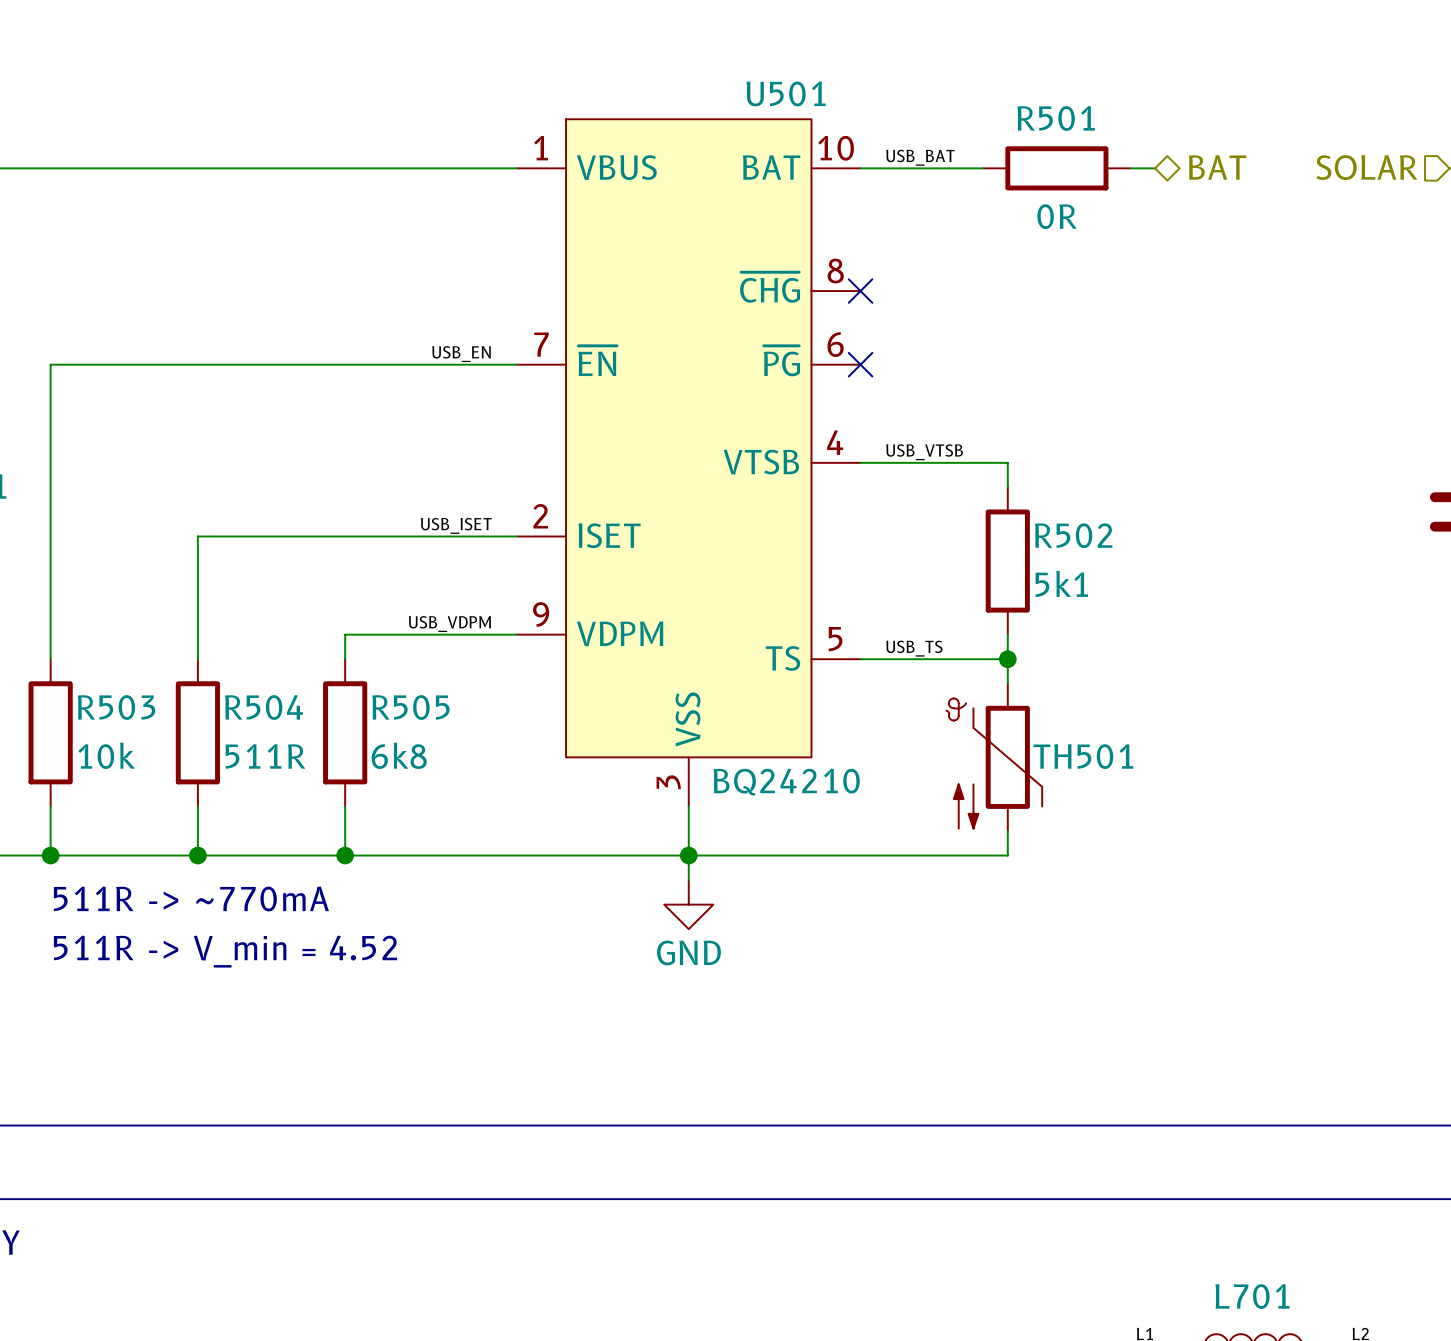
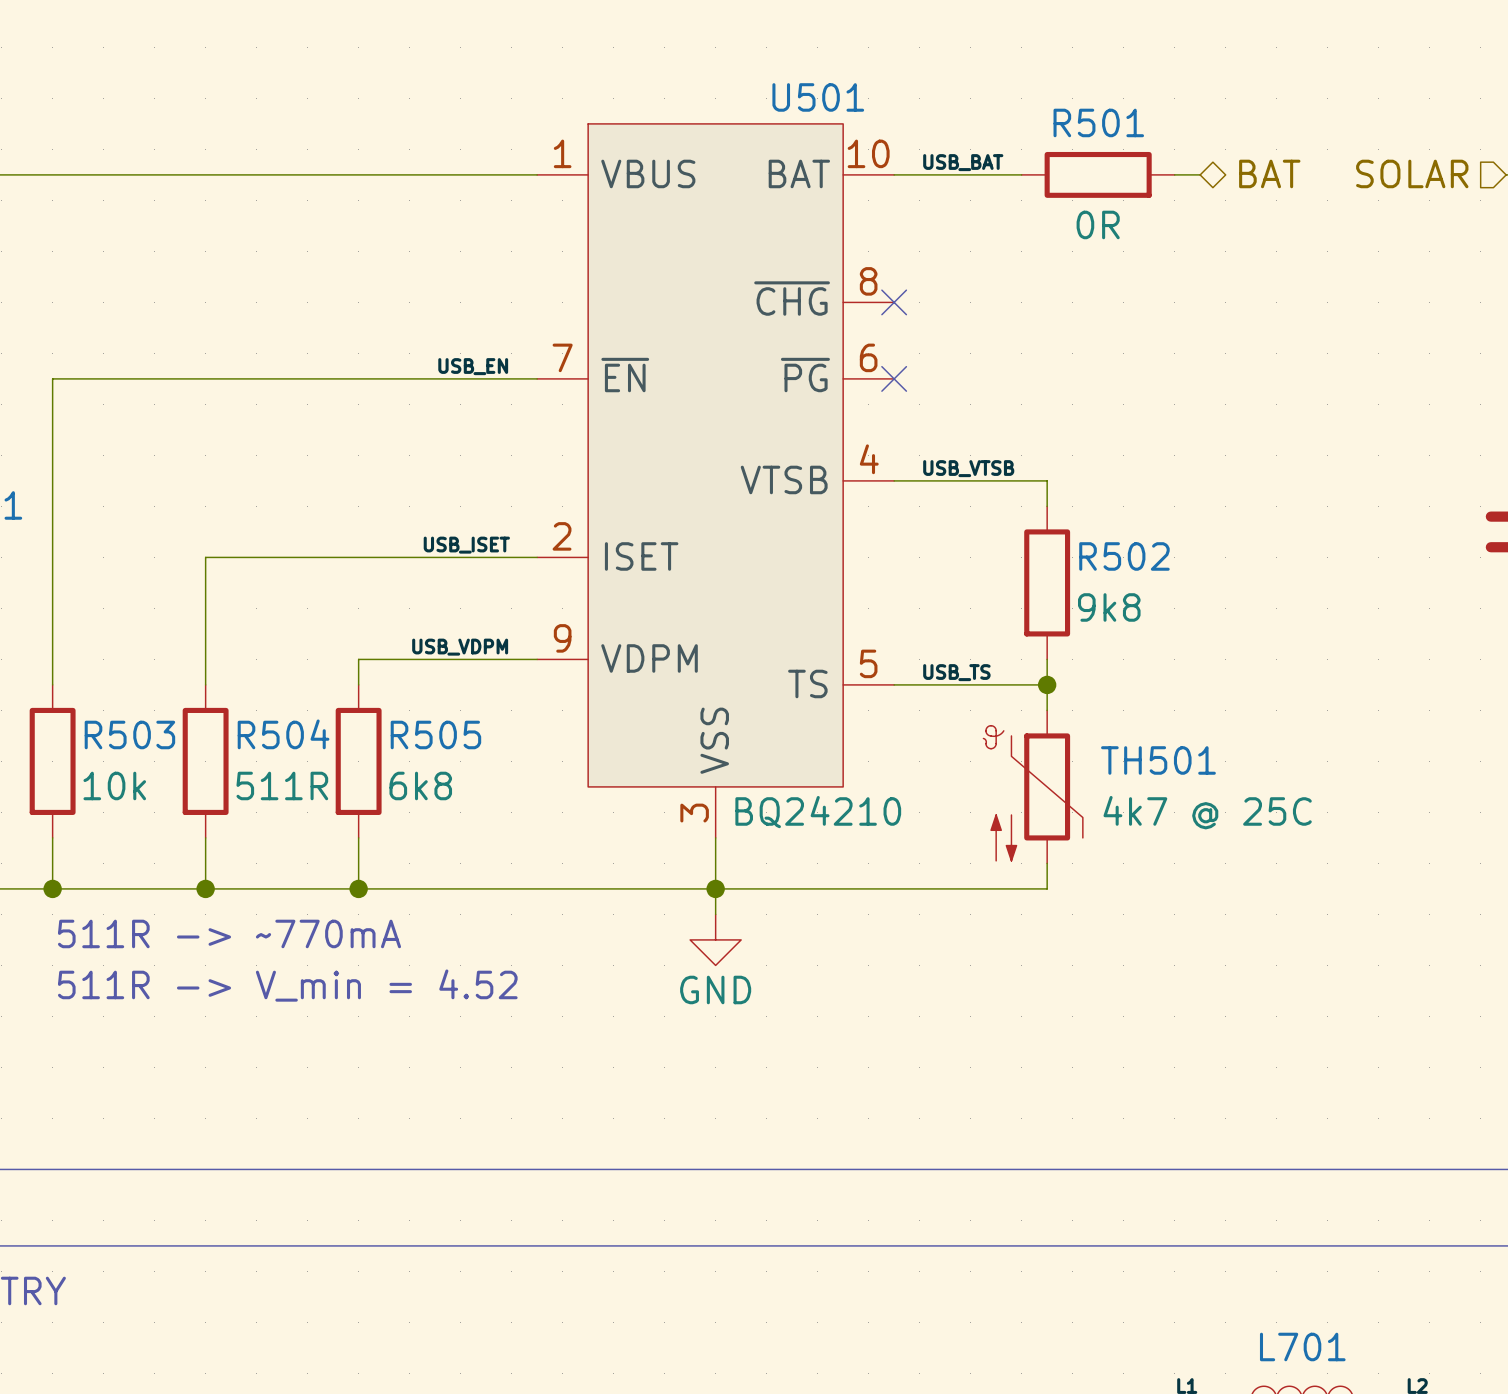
R502 value: 5k1 (1061, 583) -> 9k8 (1109, 607)
TH501 name position: TH501 (1083, 756) -> TH501 (1158, 760)
TH501 value: none -> 4k7 @ 25C (1207, 812)

